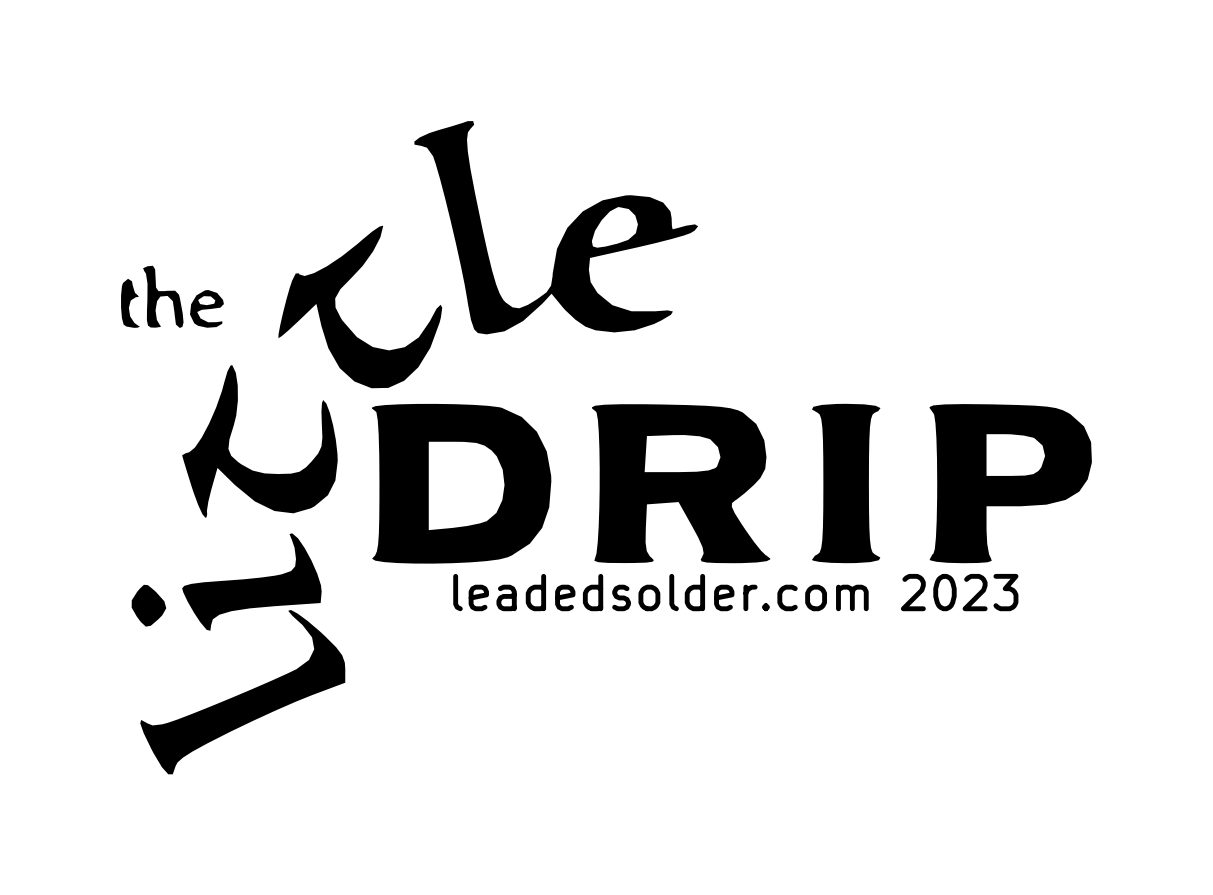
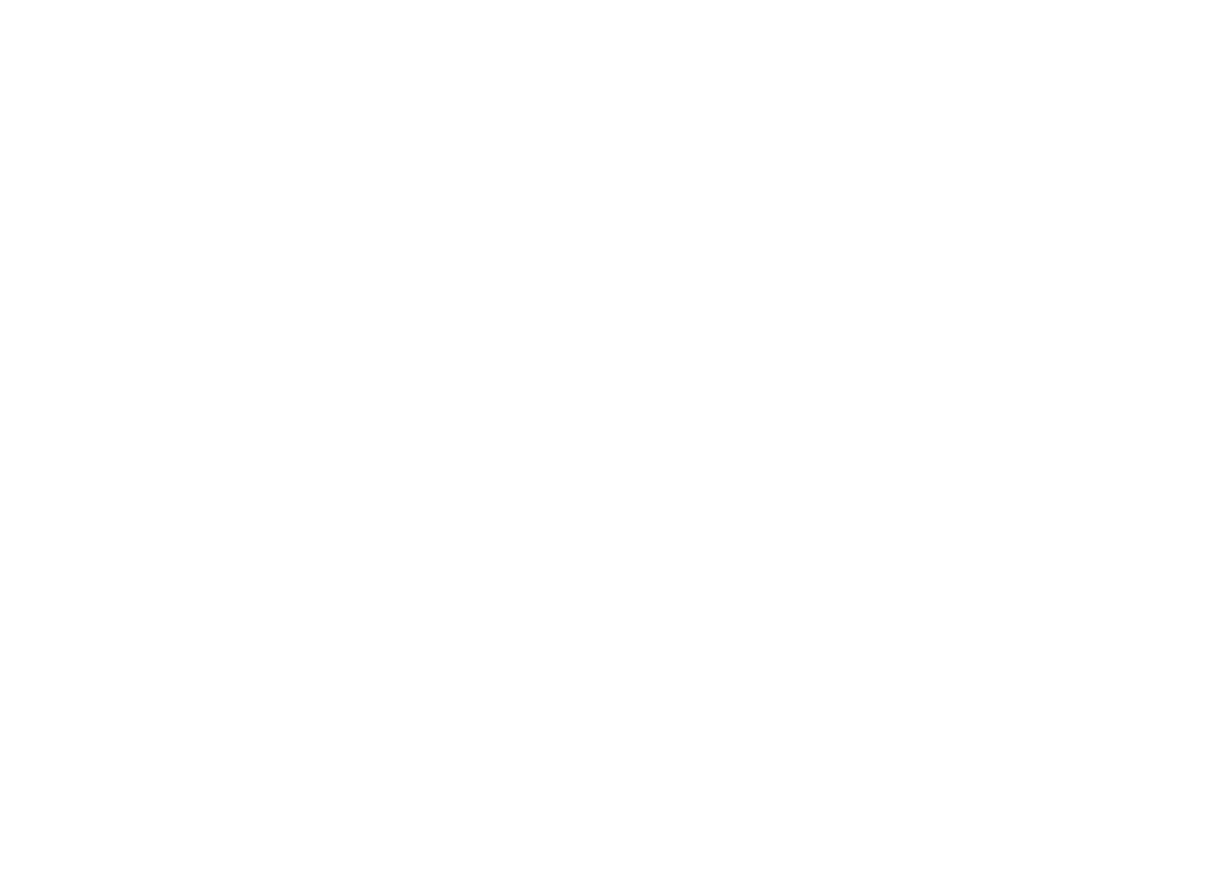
drawing: [121, 121, 1092, 775] -> none
text: leadedsolder.com 2023 (735, 592) -> none

